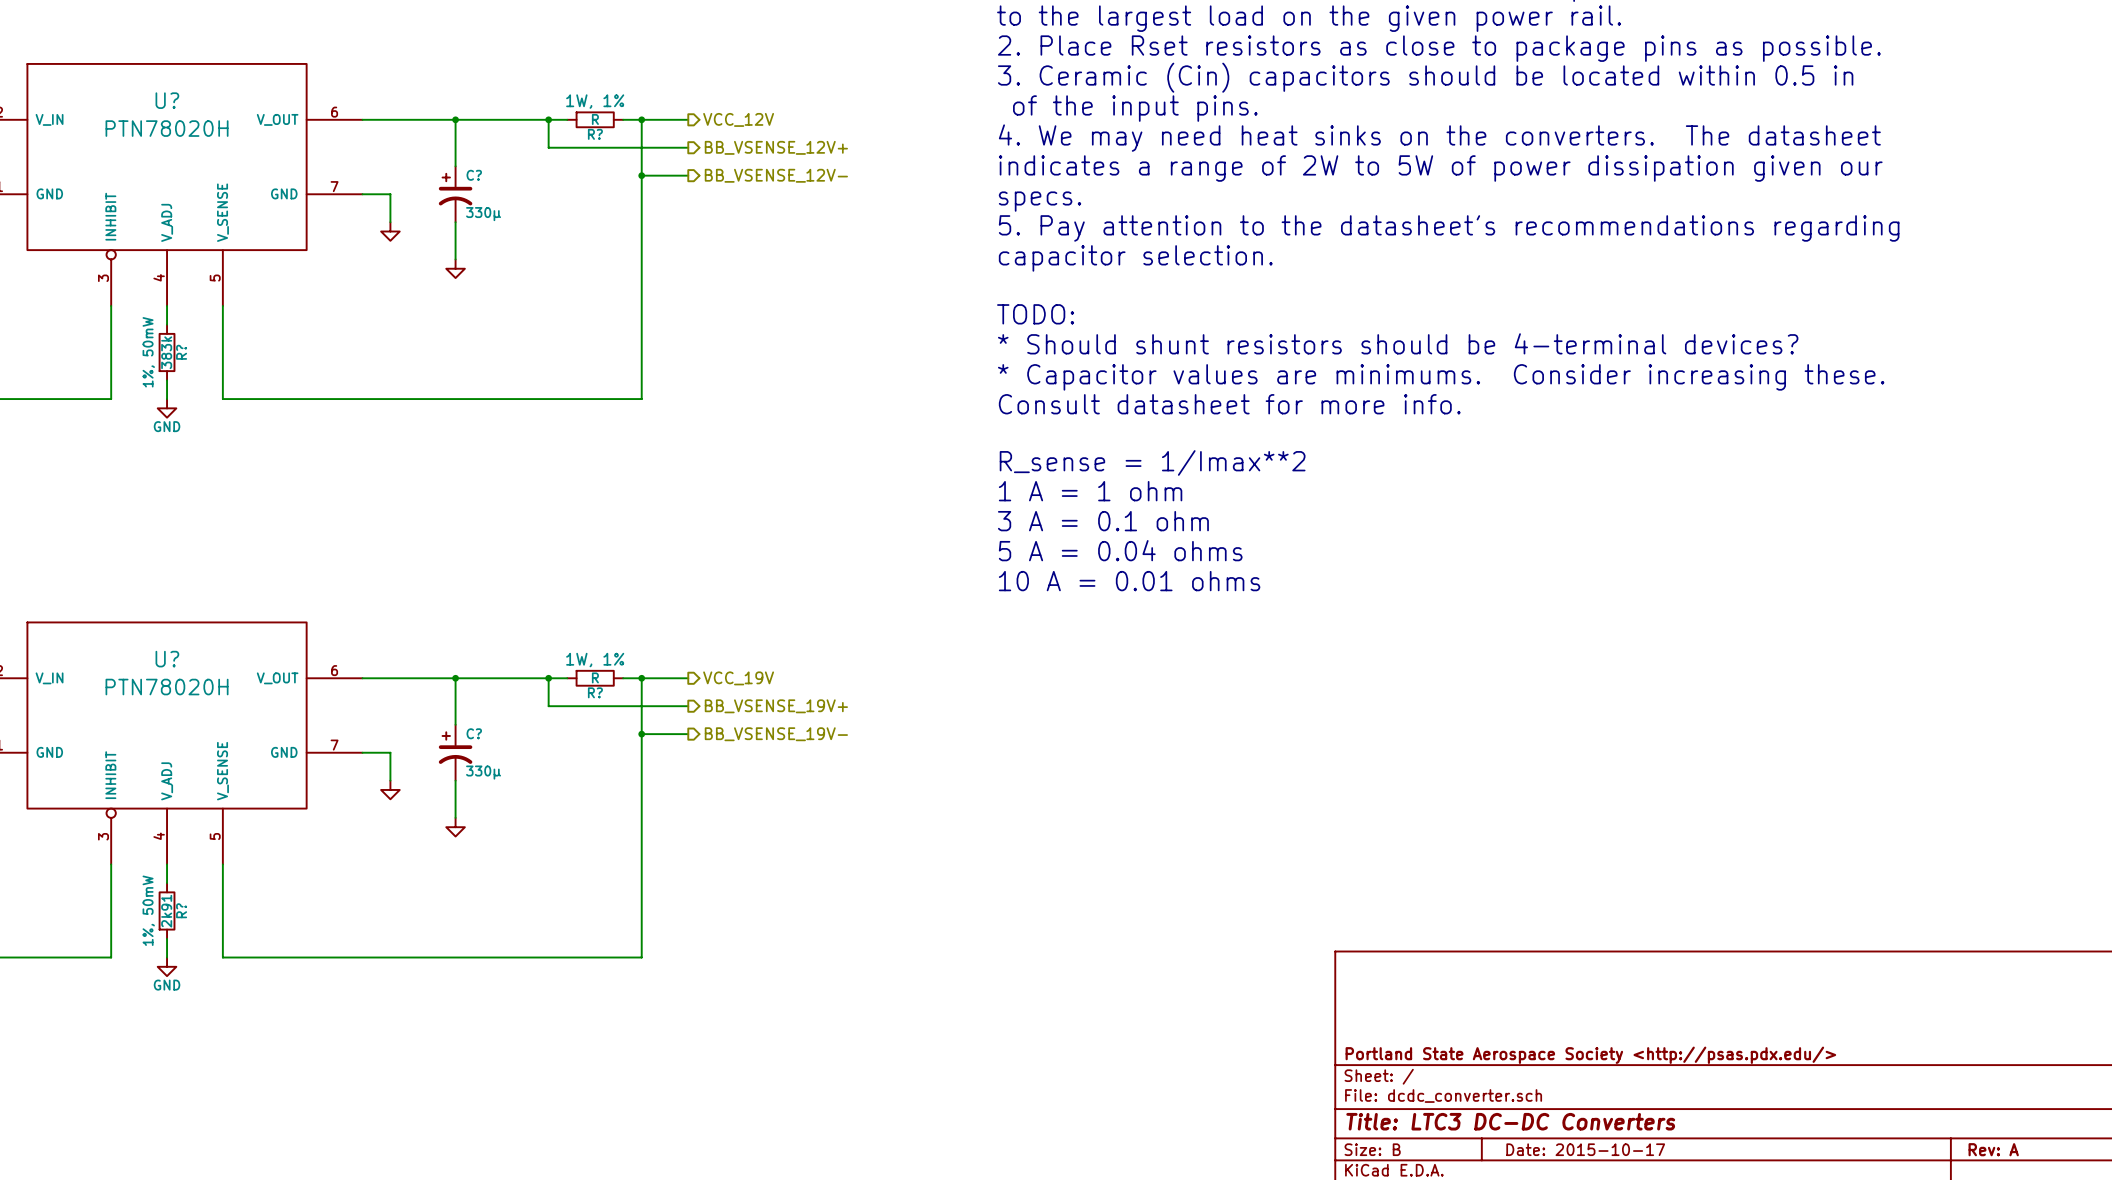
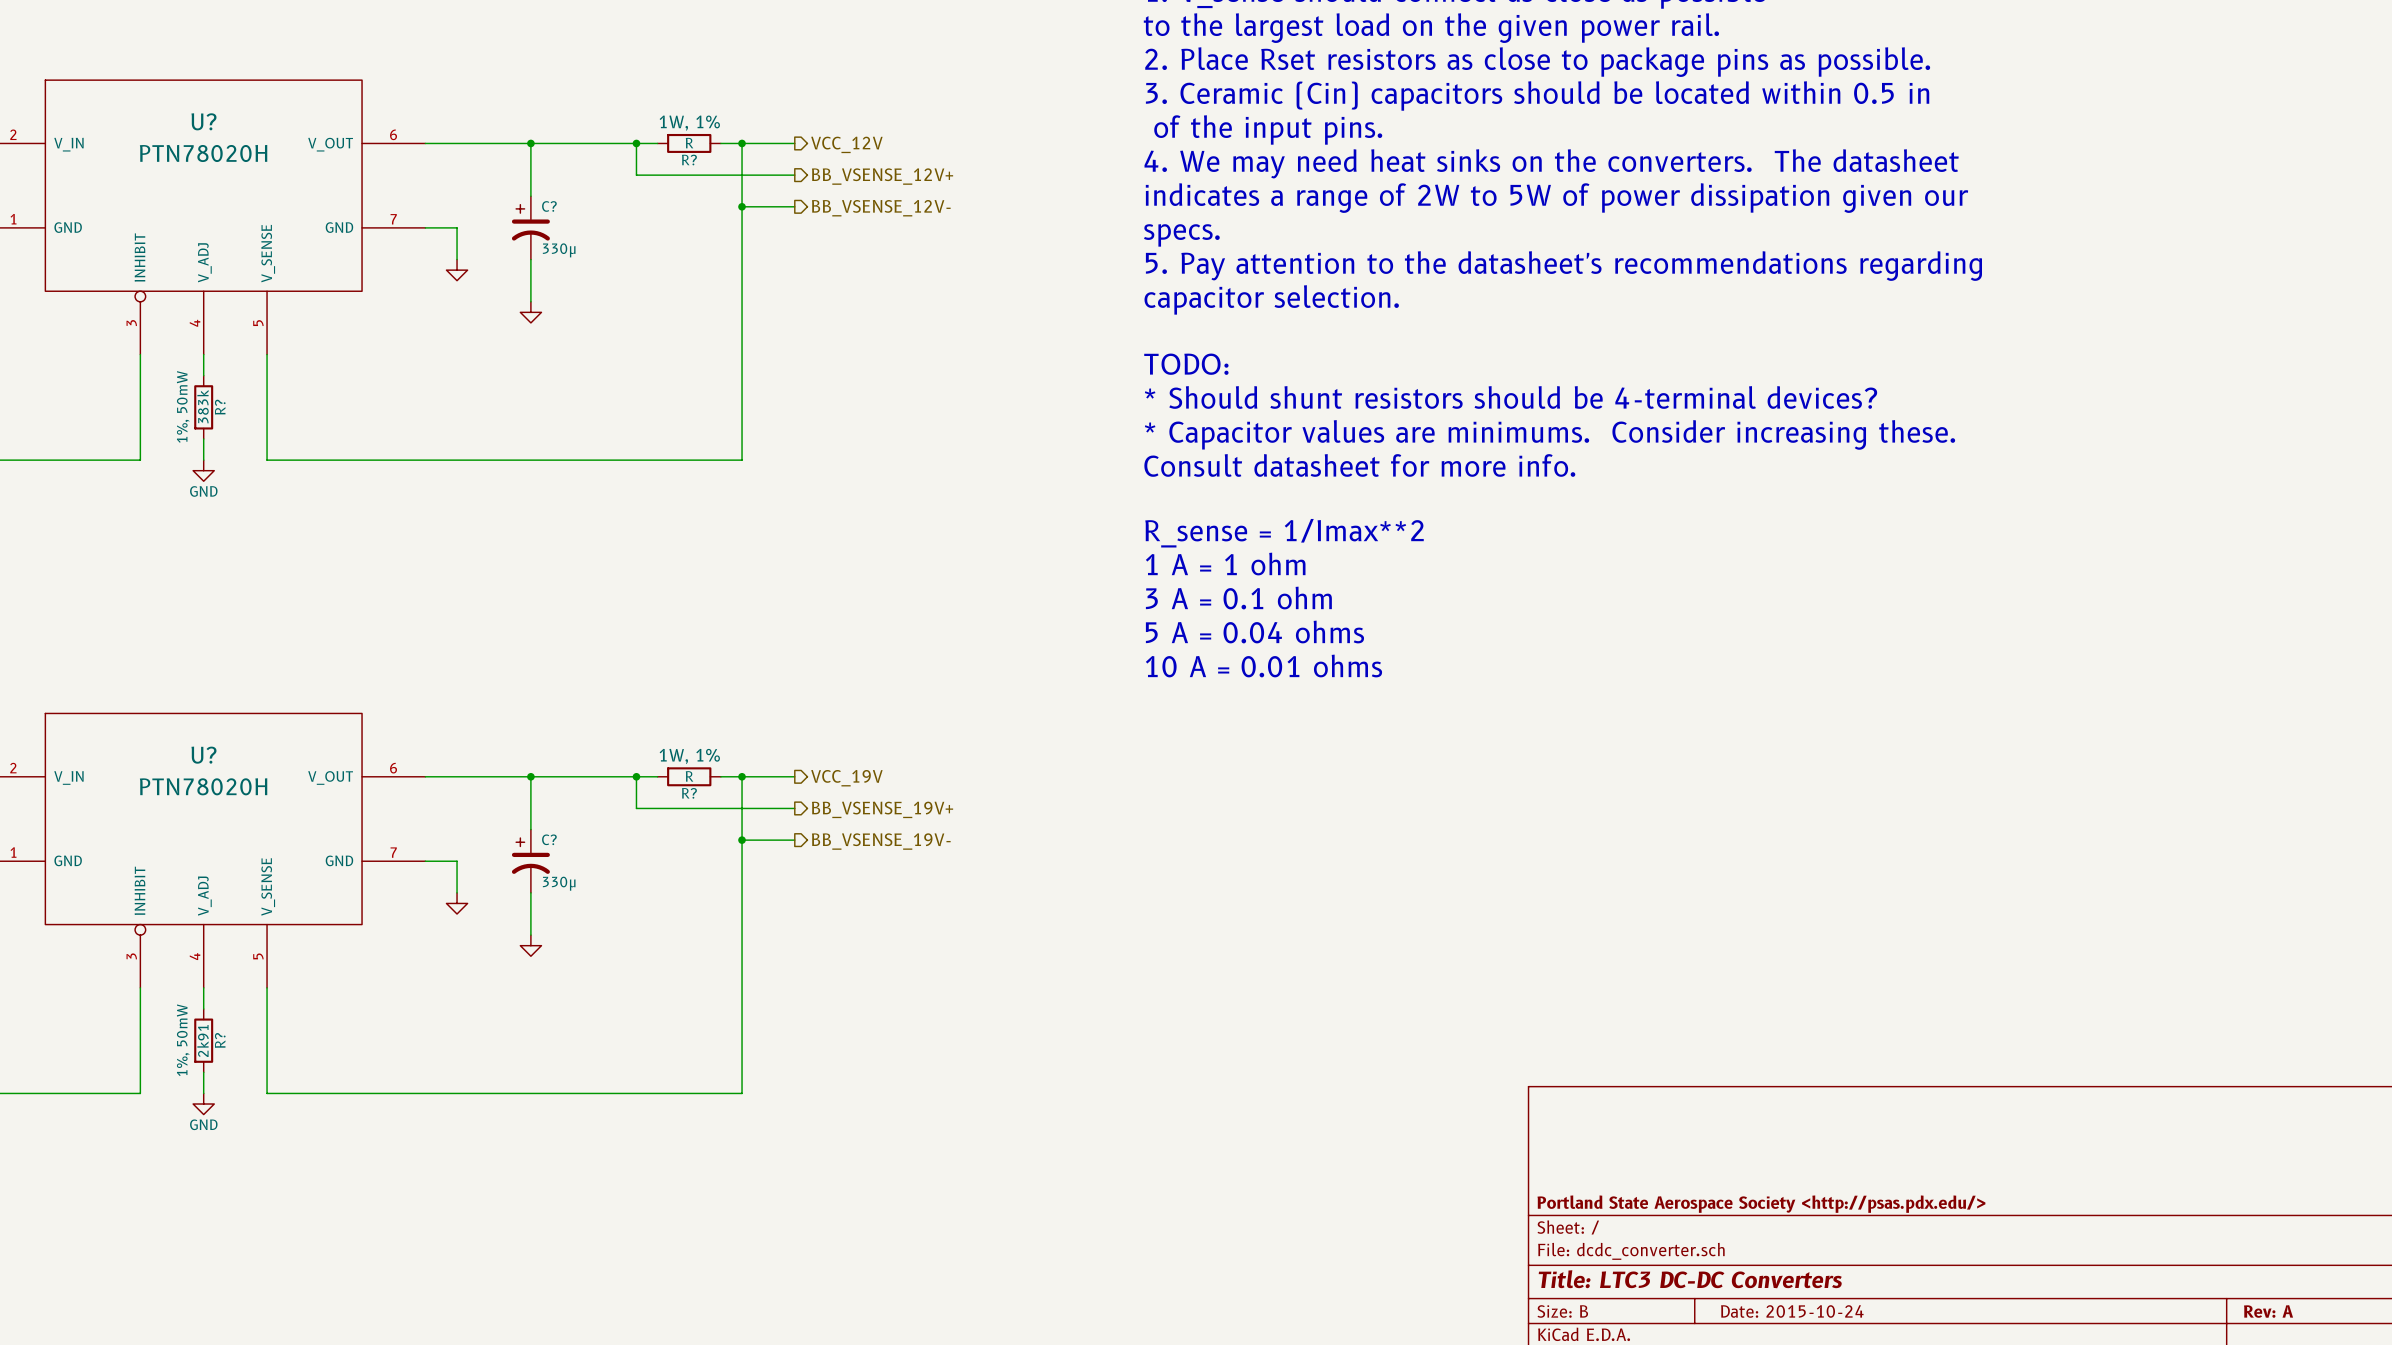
title block: Date: 2015-10-17 (1585, 1149) -> Date: 2015-10-24 (1792, 1311)

